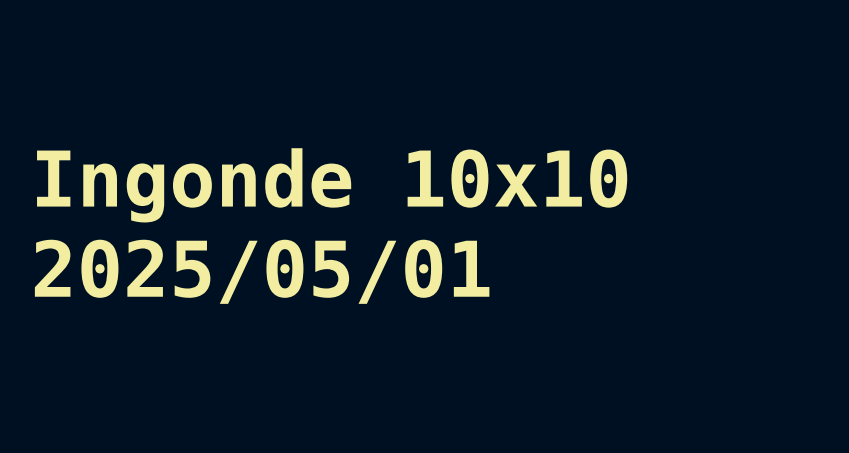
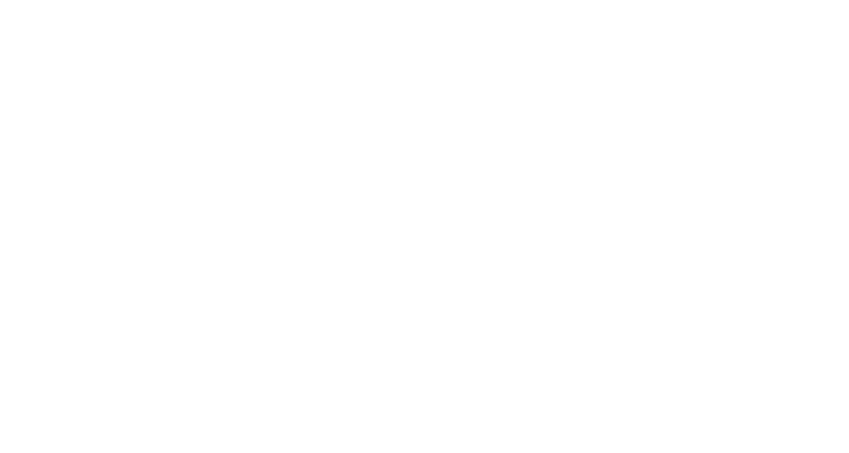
text: Ingonde 10x10 (332, 185) -> none
text: 2025/05/01 (262, 271) -> none

